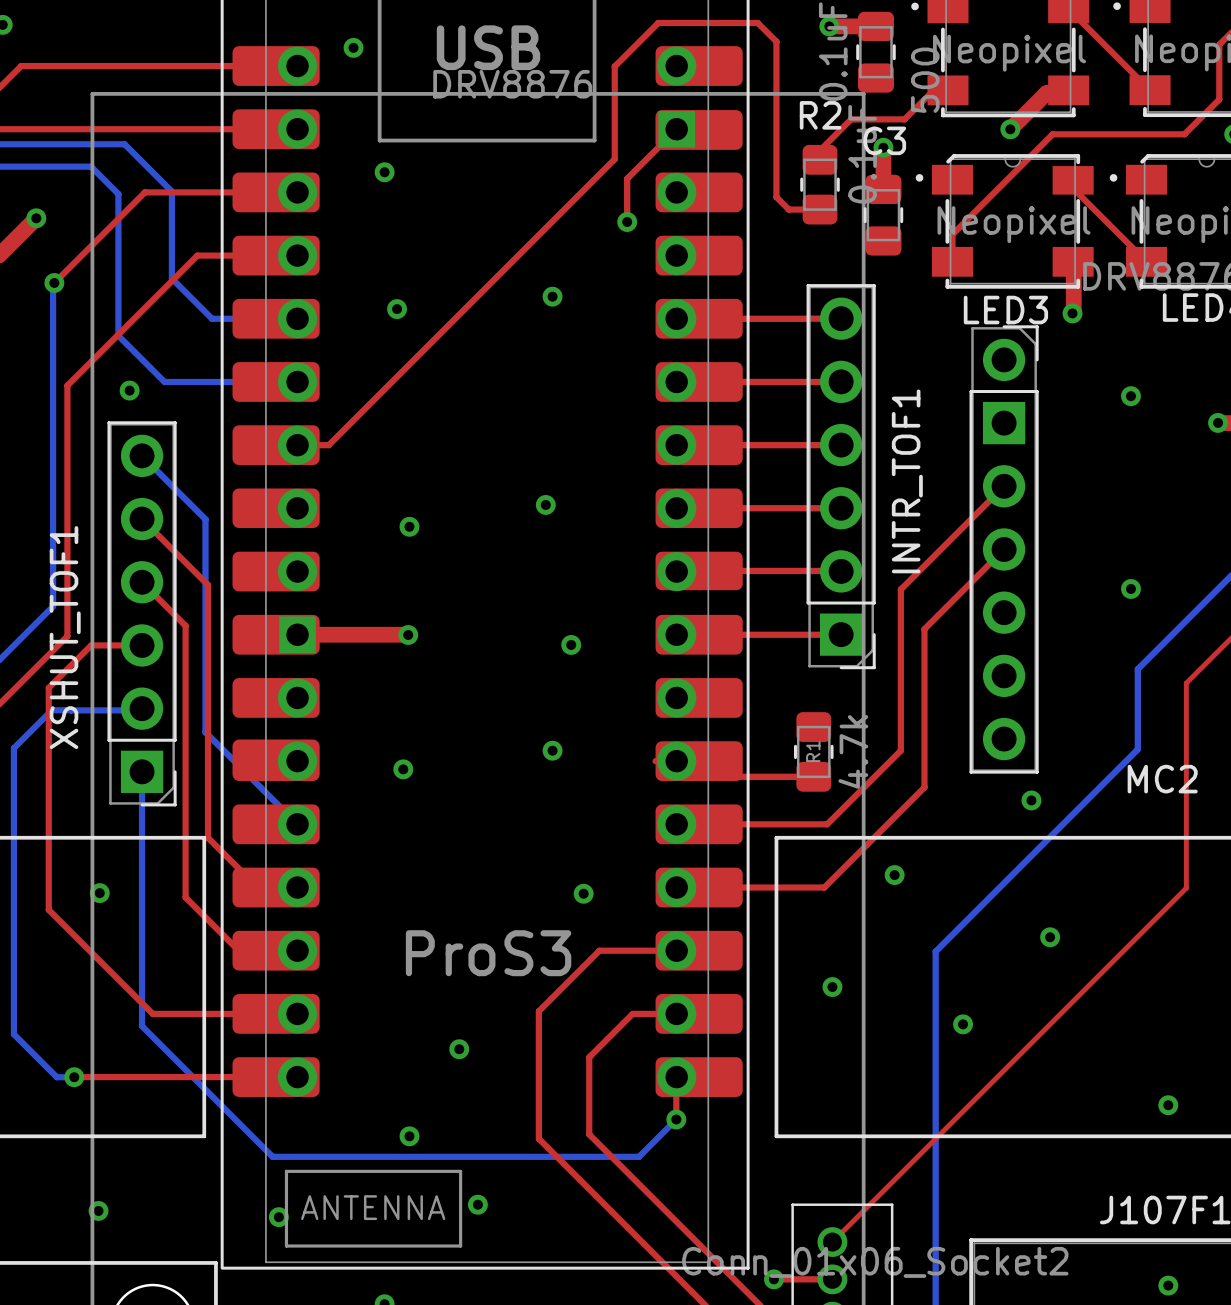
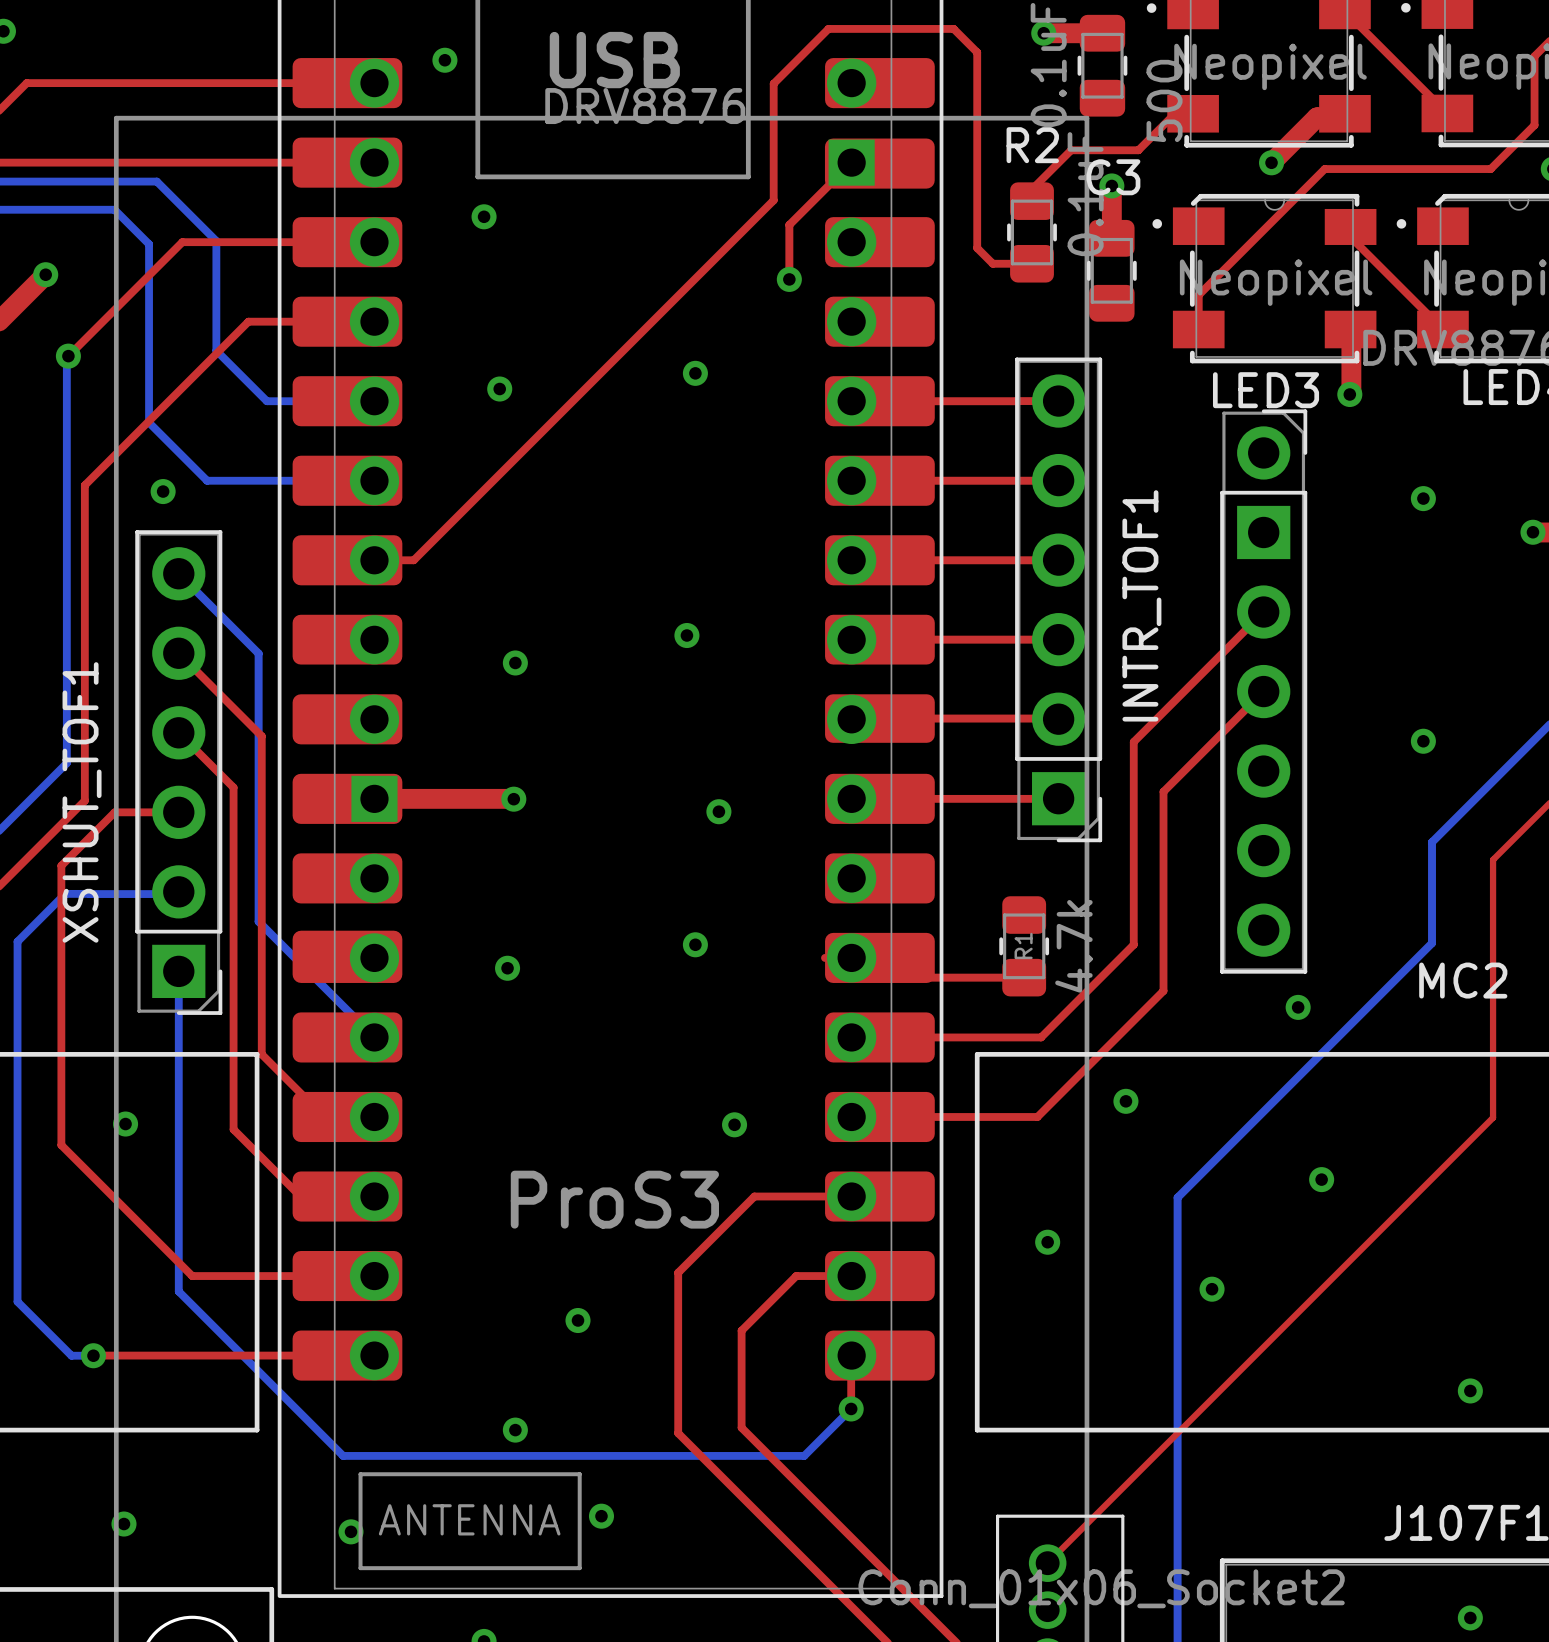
top track: (773, 1279) (832, 1279) -> none
via: (773, 1279) -> none

